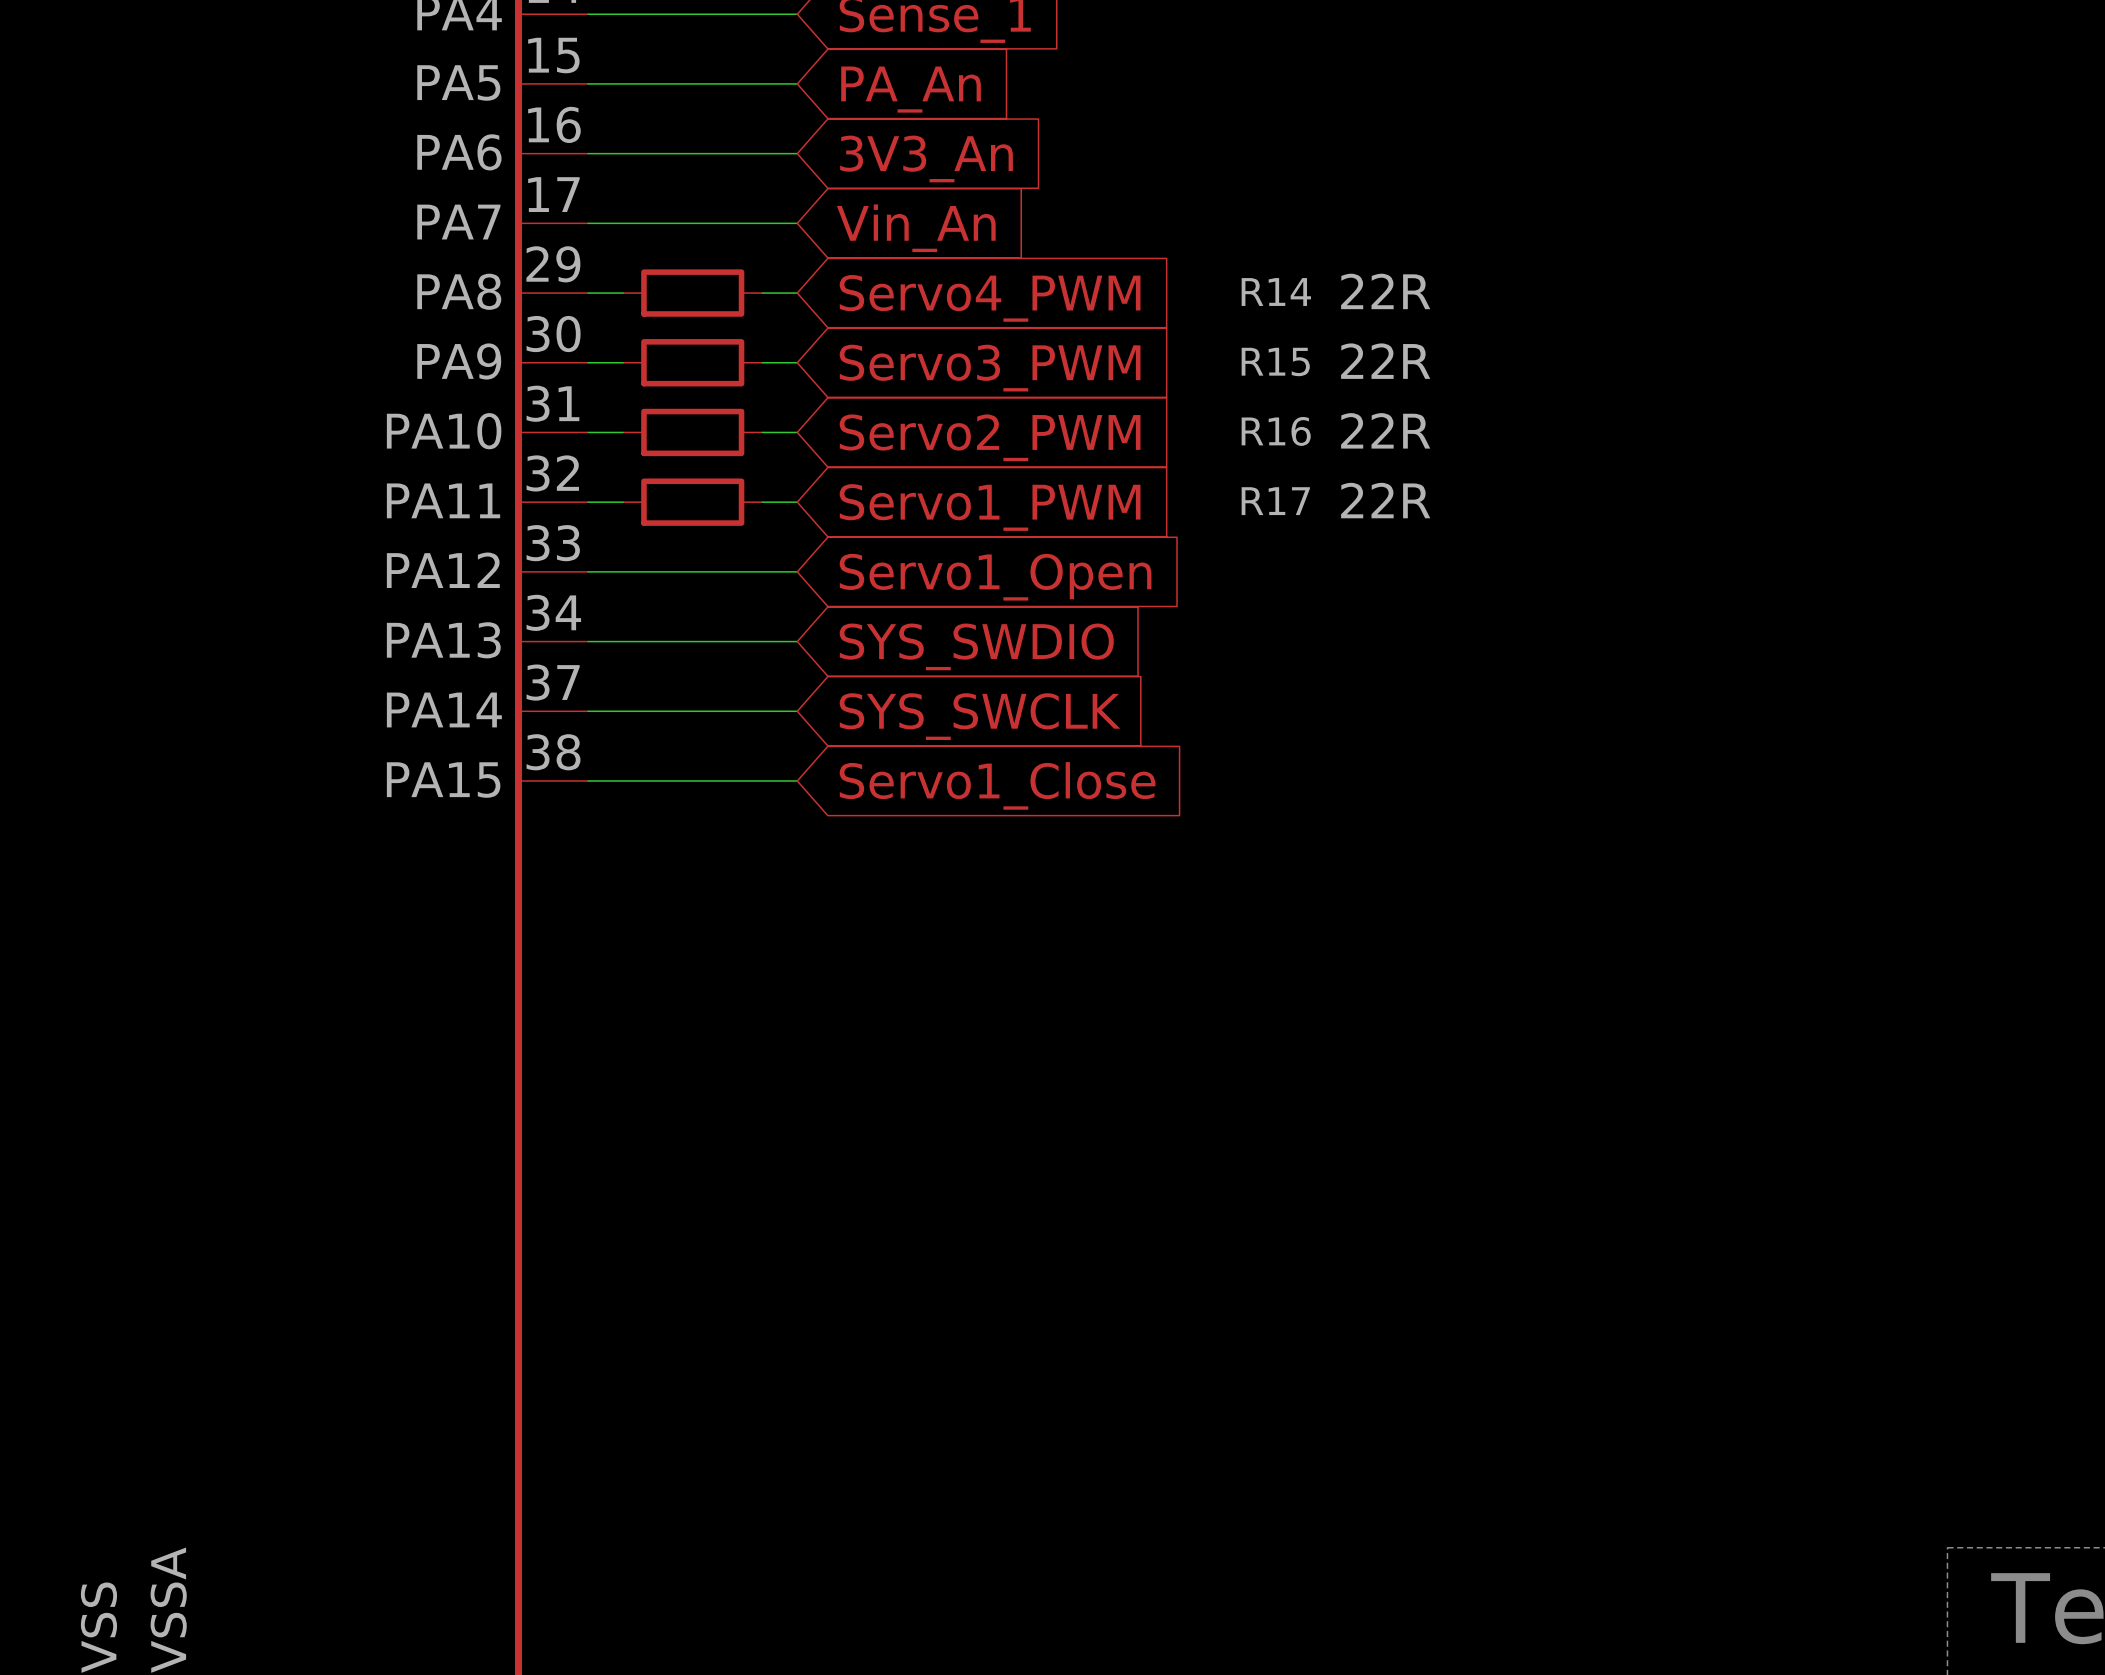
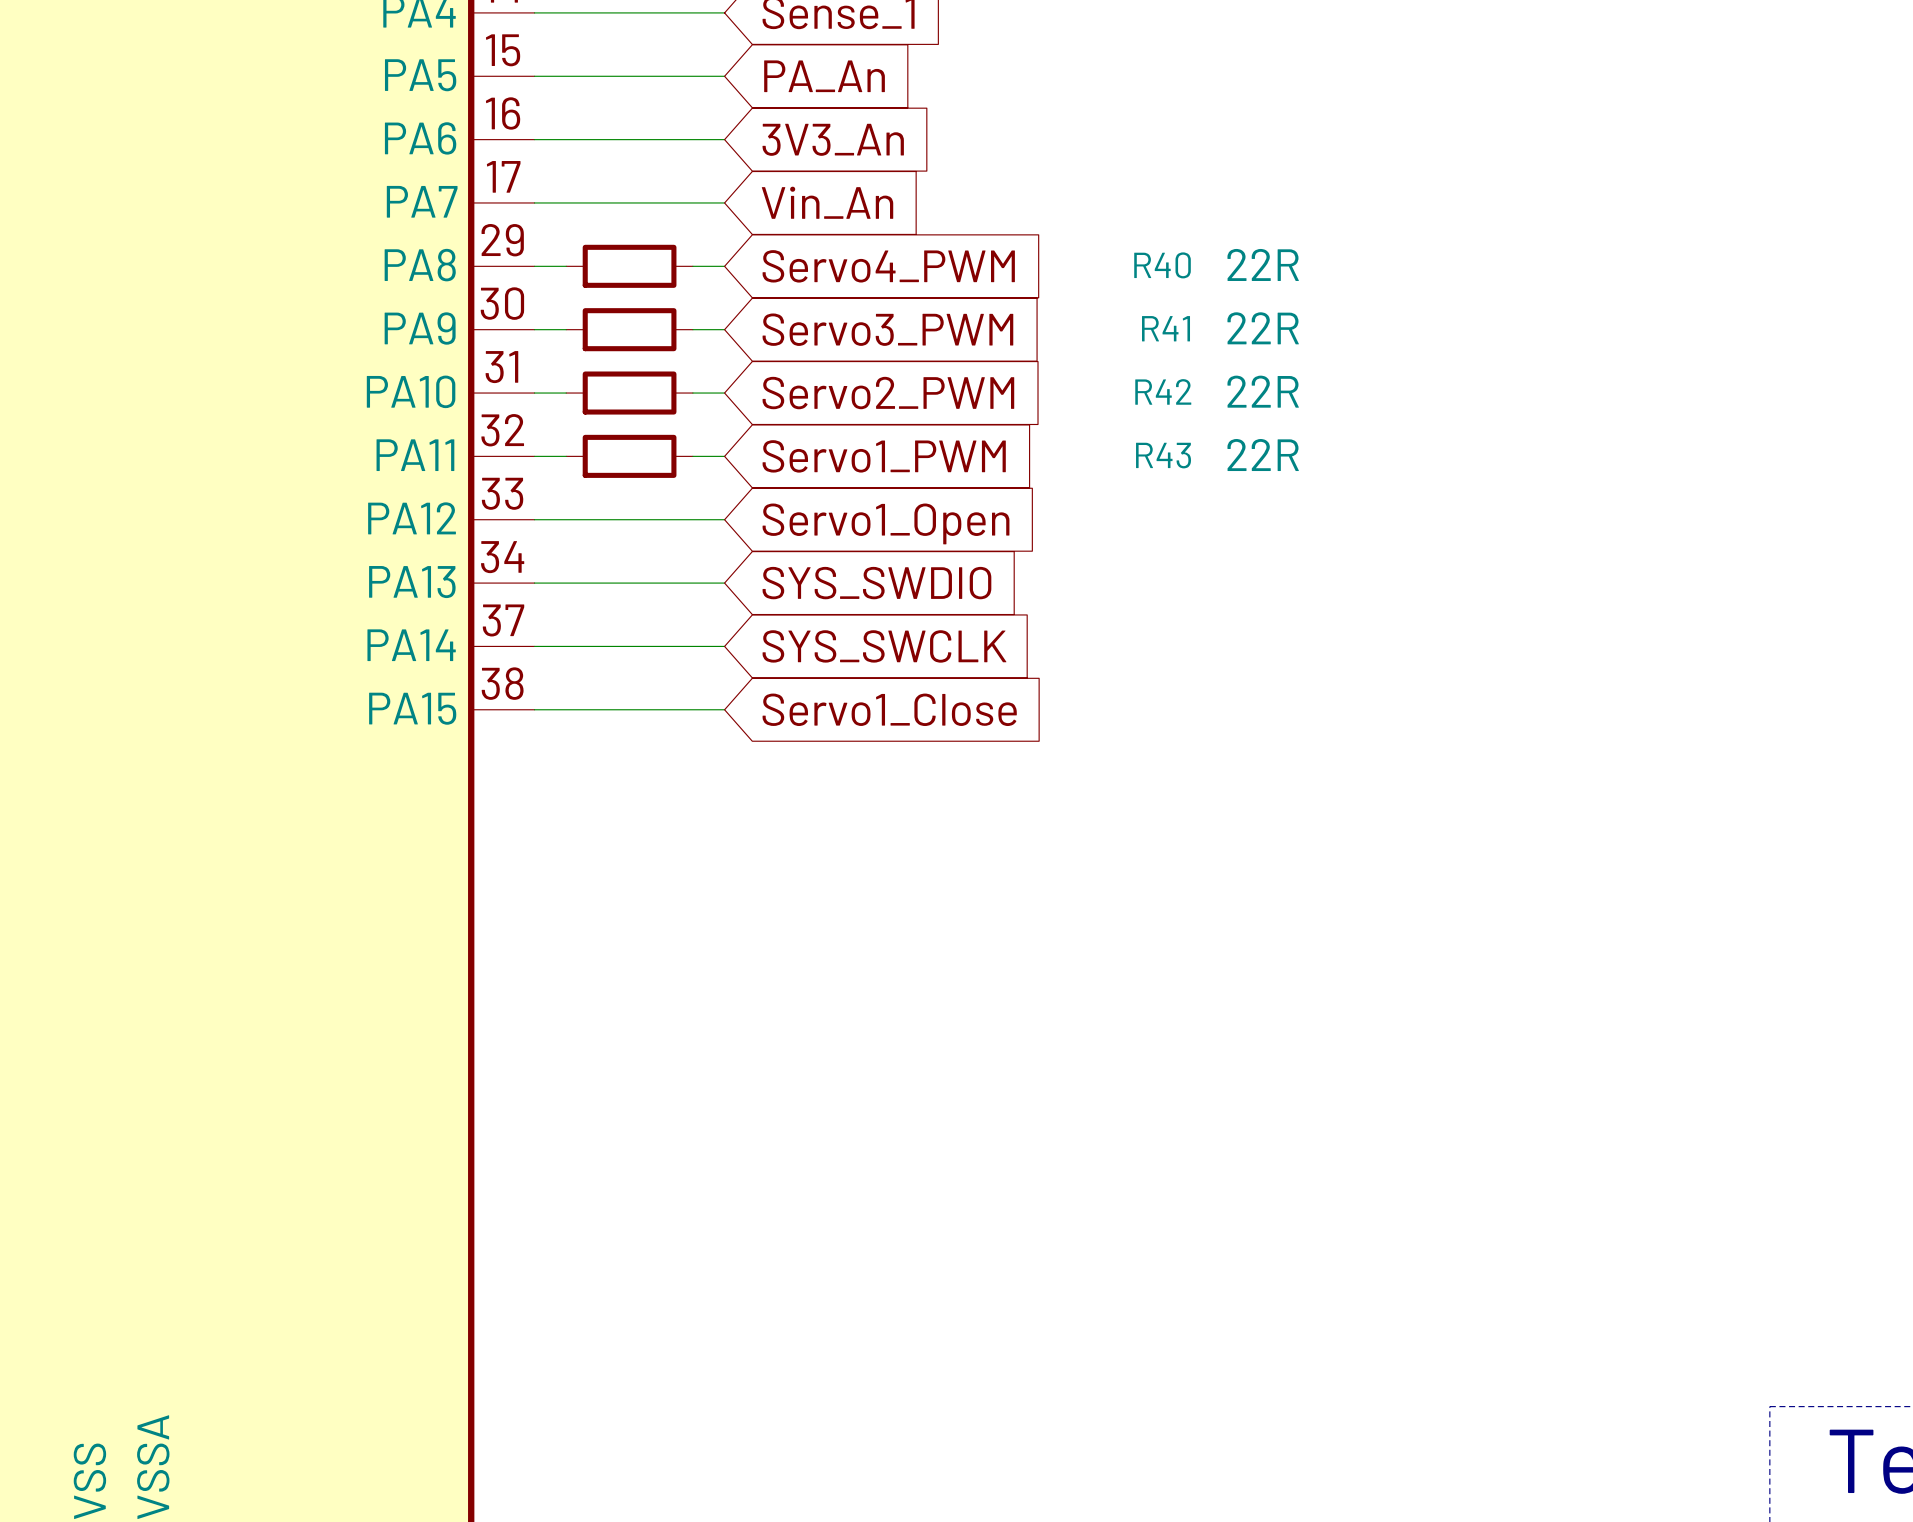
R14 name: R14 (1276, 292) -> R40 (1162, 265)
R15 name: R15 (1275, 361) -> R41 (1166, 328)
R16 name: R16 (1276, 431) -> R42 (1163, 391)
R17 name: R17 (1275, 501) -> R43 (1163, 455)

